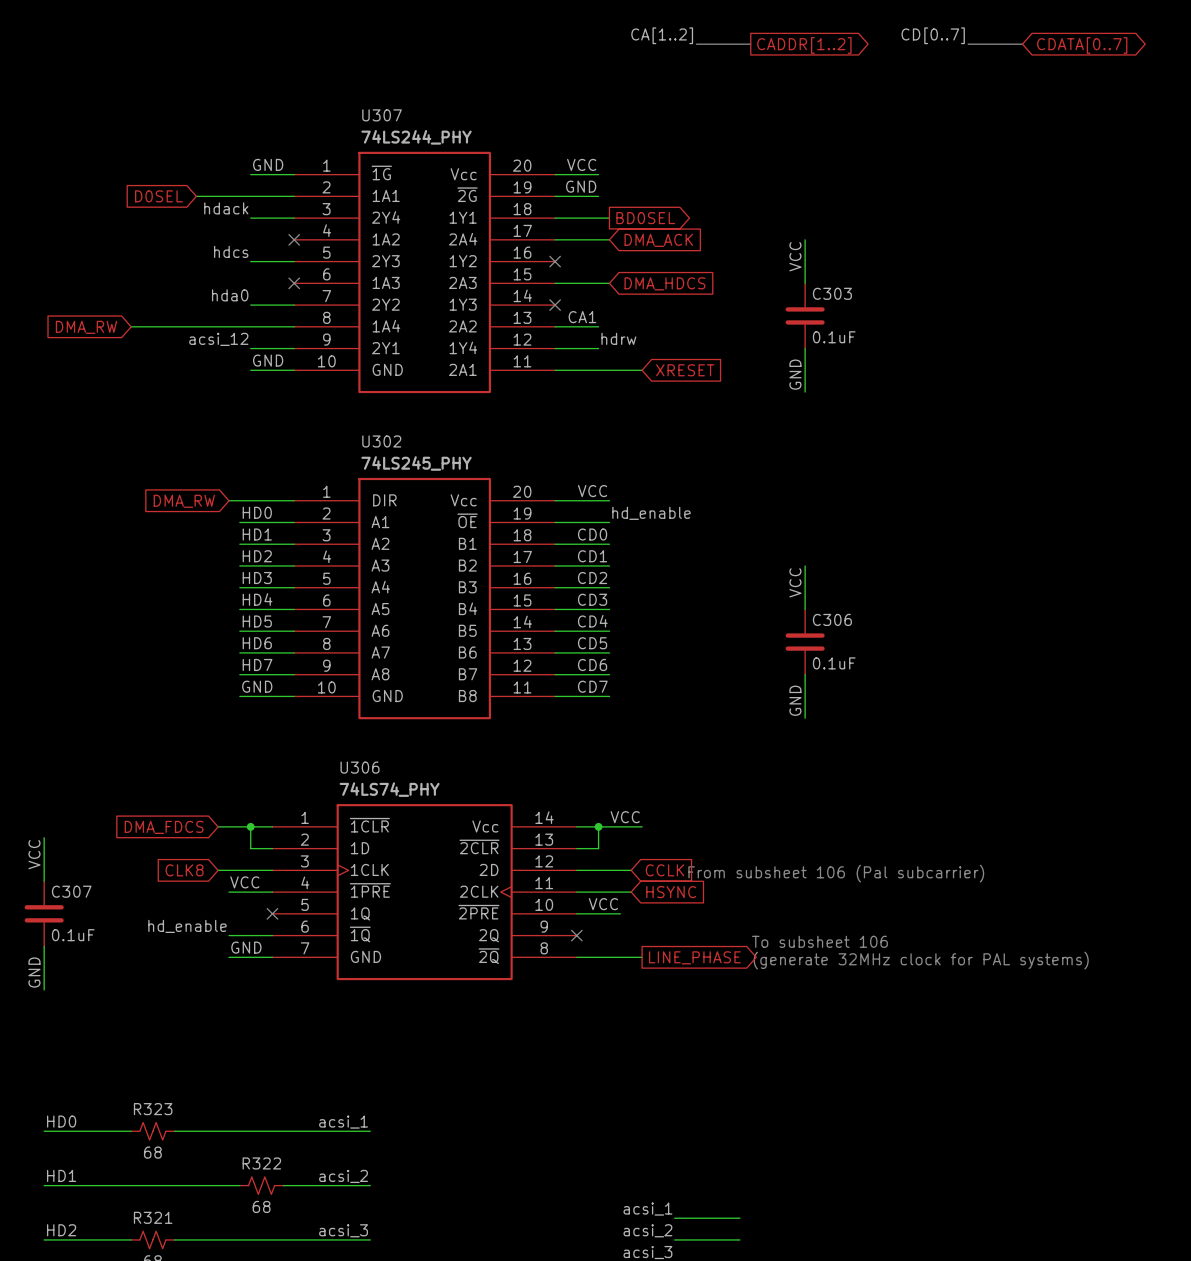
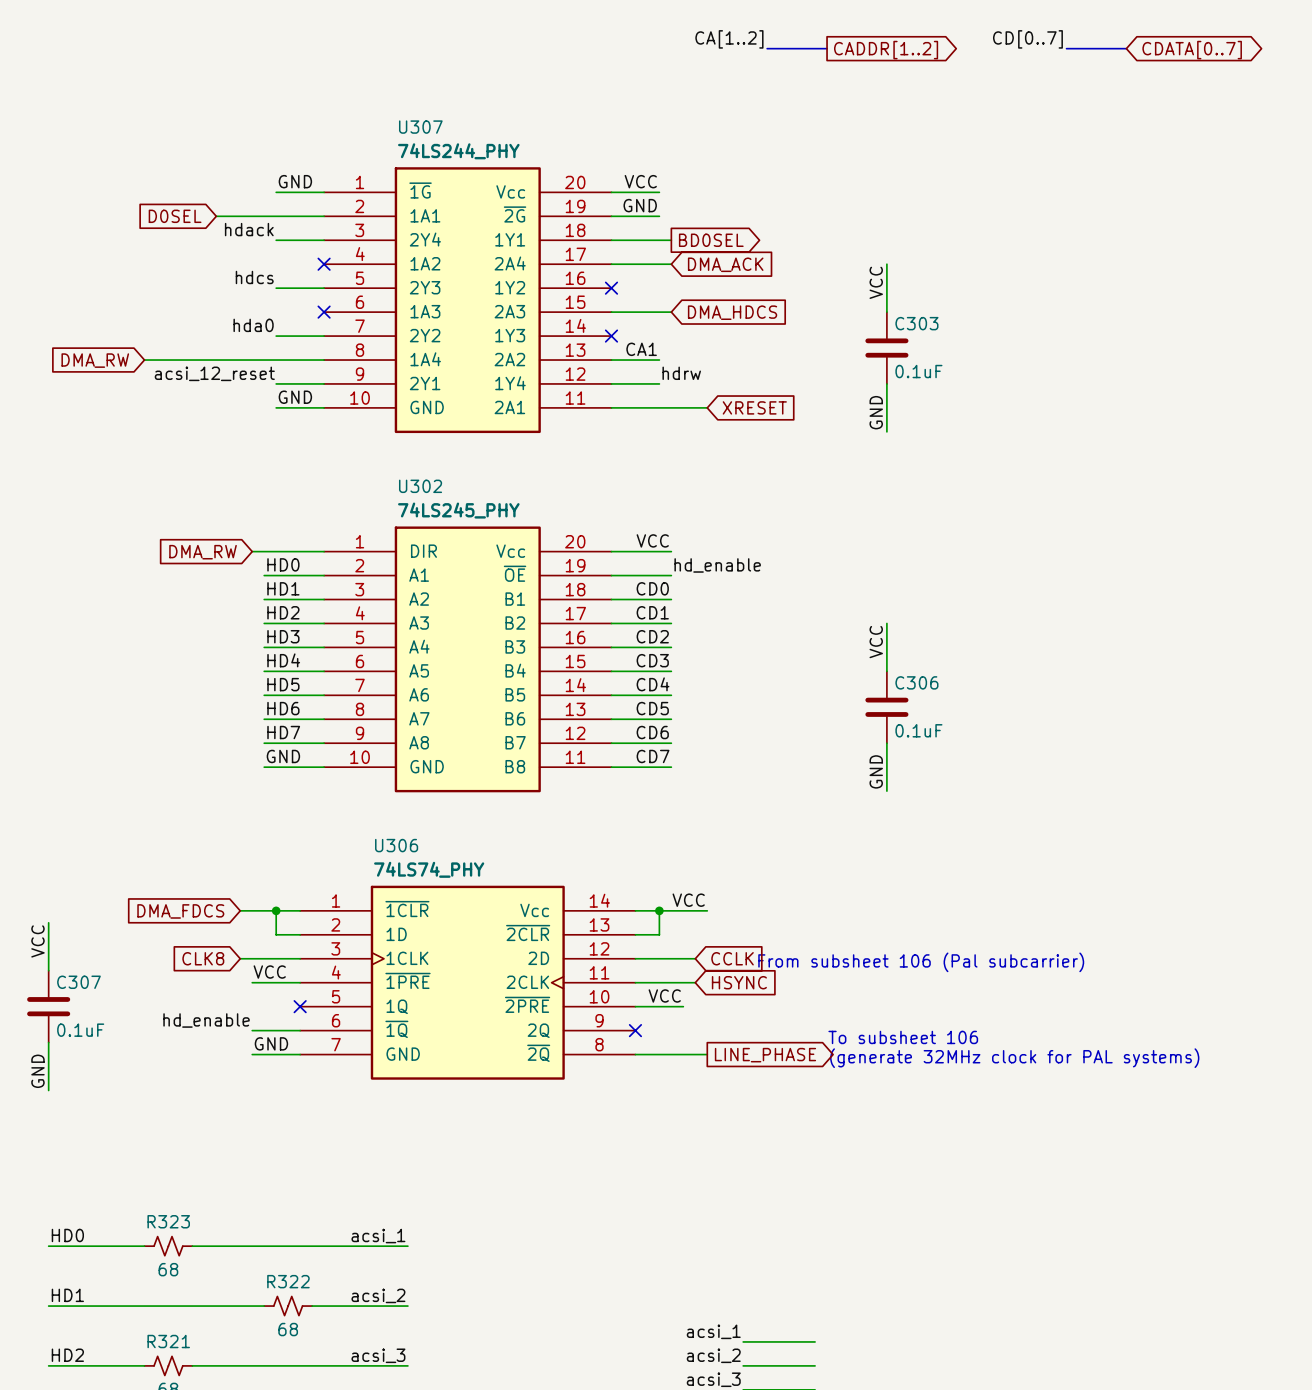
label: acsi_12 (218, 339) -> acsi_12_reset (214, 373)

